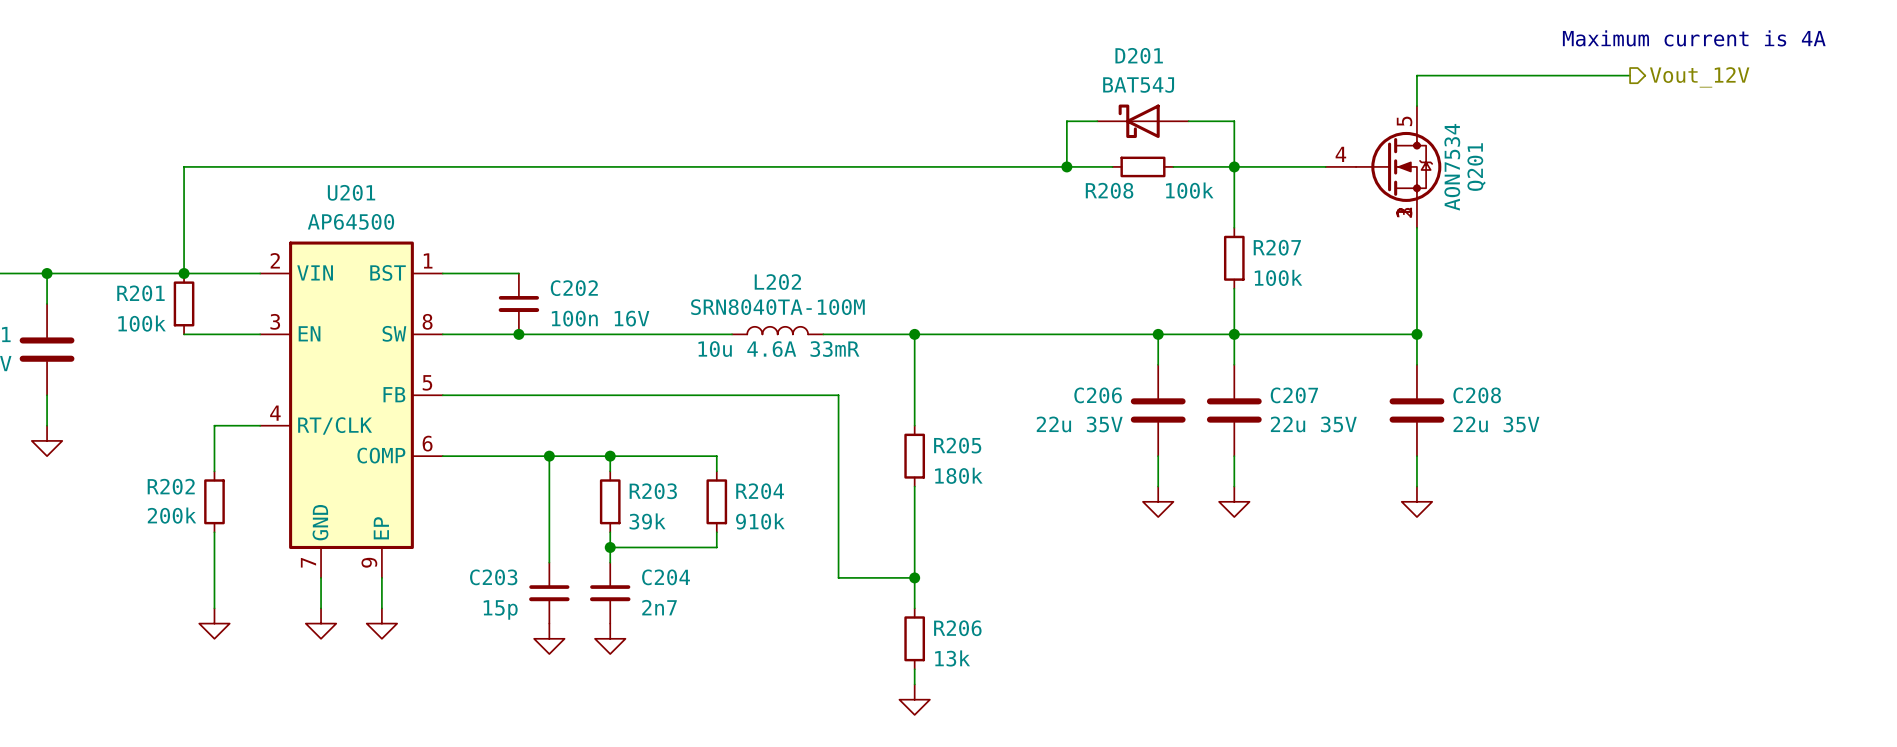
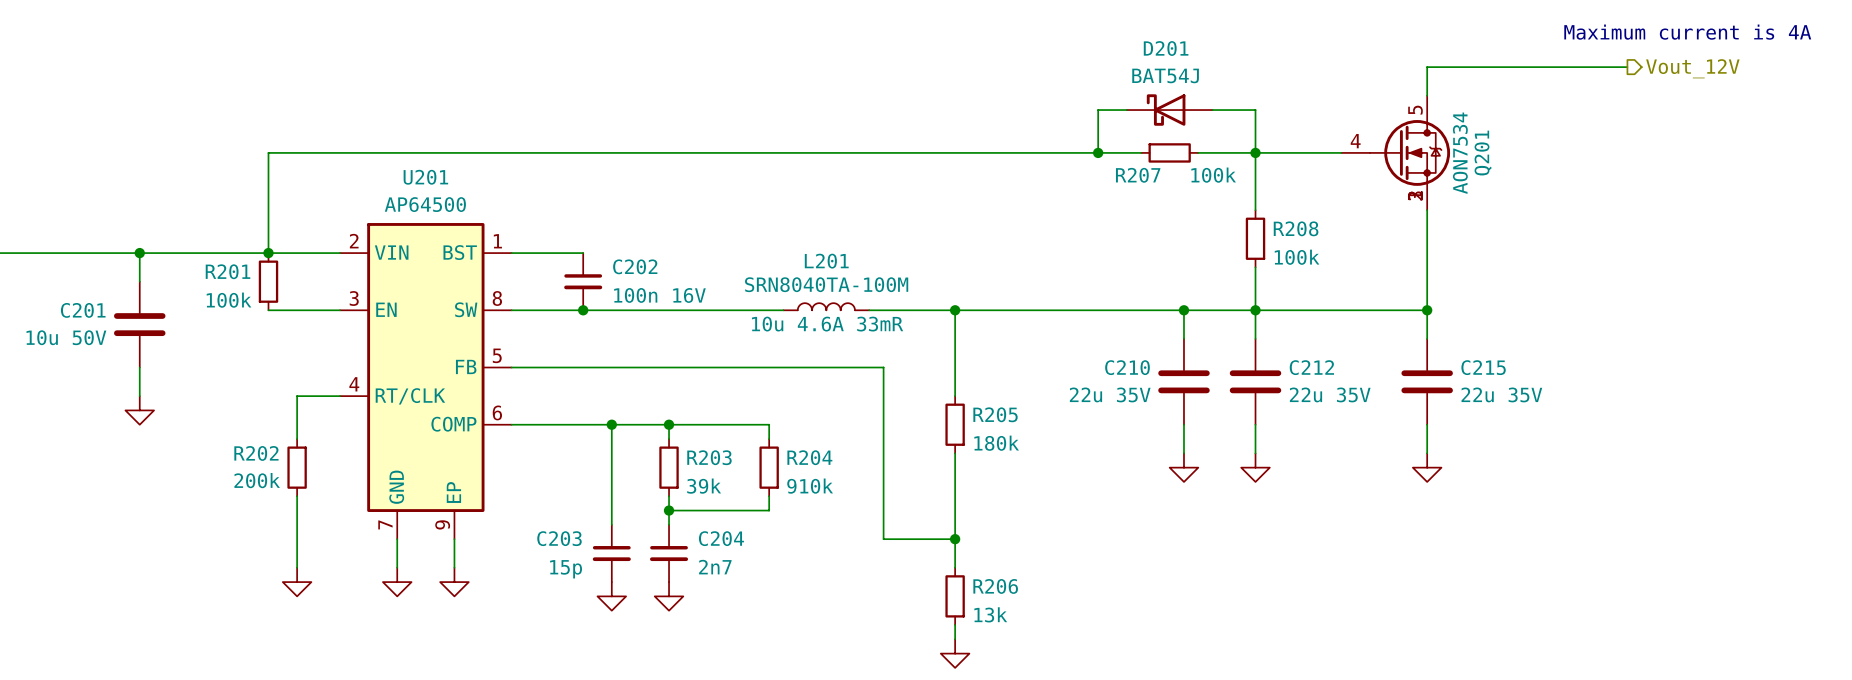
R208 name: R208 (1109, 190) -> R207 (1138, 175)
R207 name: R207 (1277, 247) -> R208 (1296, 228)
L202 name: L202 (777, 282) -> L201 (826, 261)
C206 name: C206 (1098, 395) -> C210 (1127, 367)
C207 name: C207 (1294, 395) -> C212 (1311, 367)
C208 name: C208 (1477, 395) -> C215 (1483, 367)

